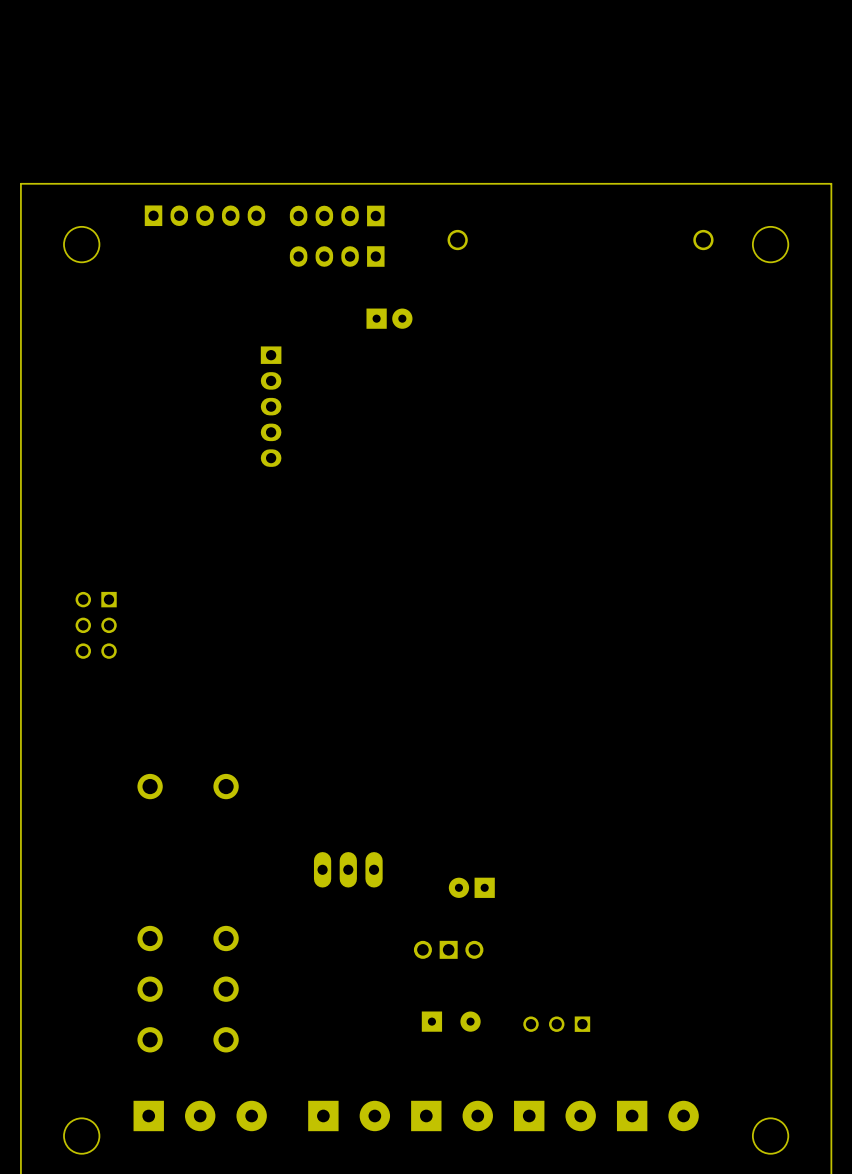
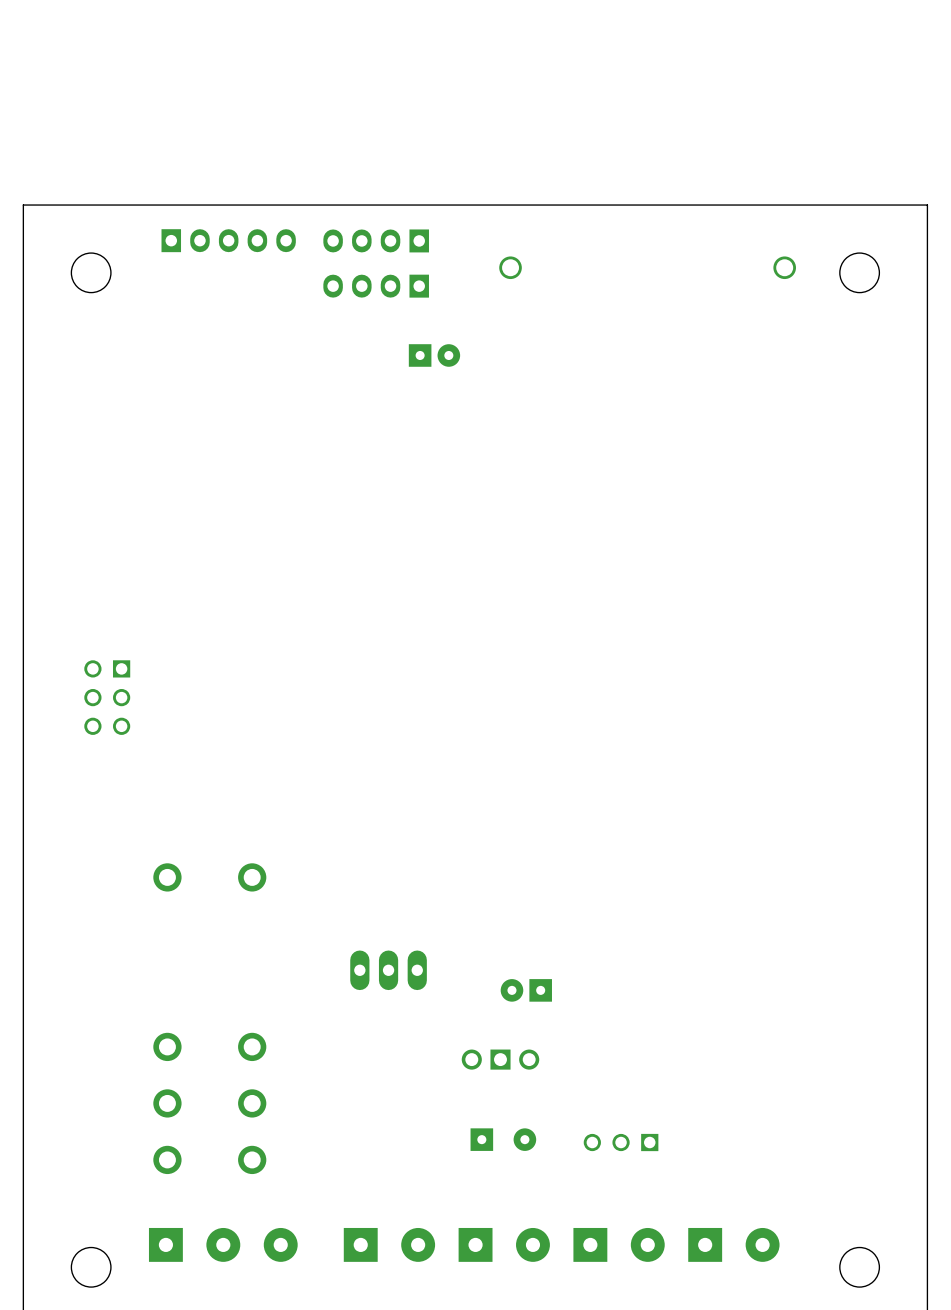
part: (271, 406) -> none

